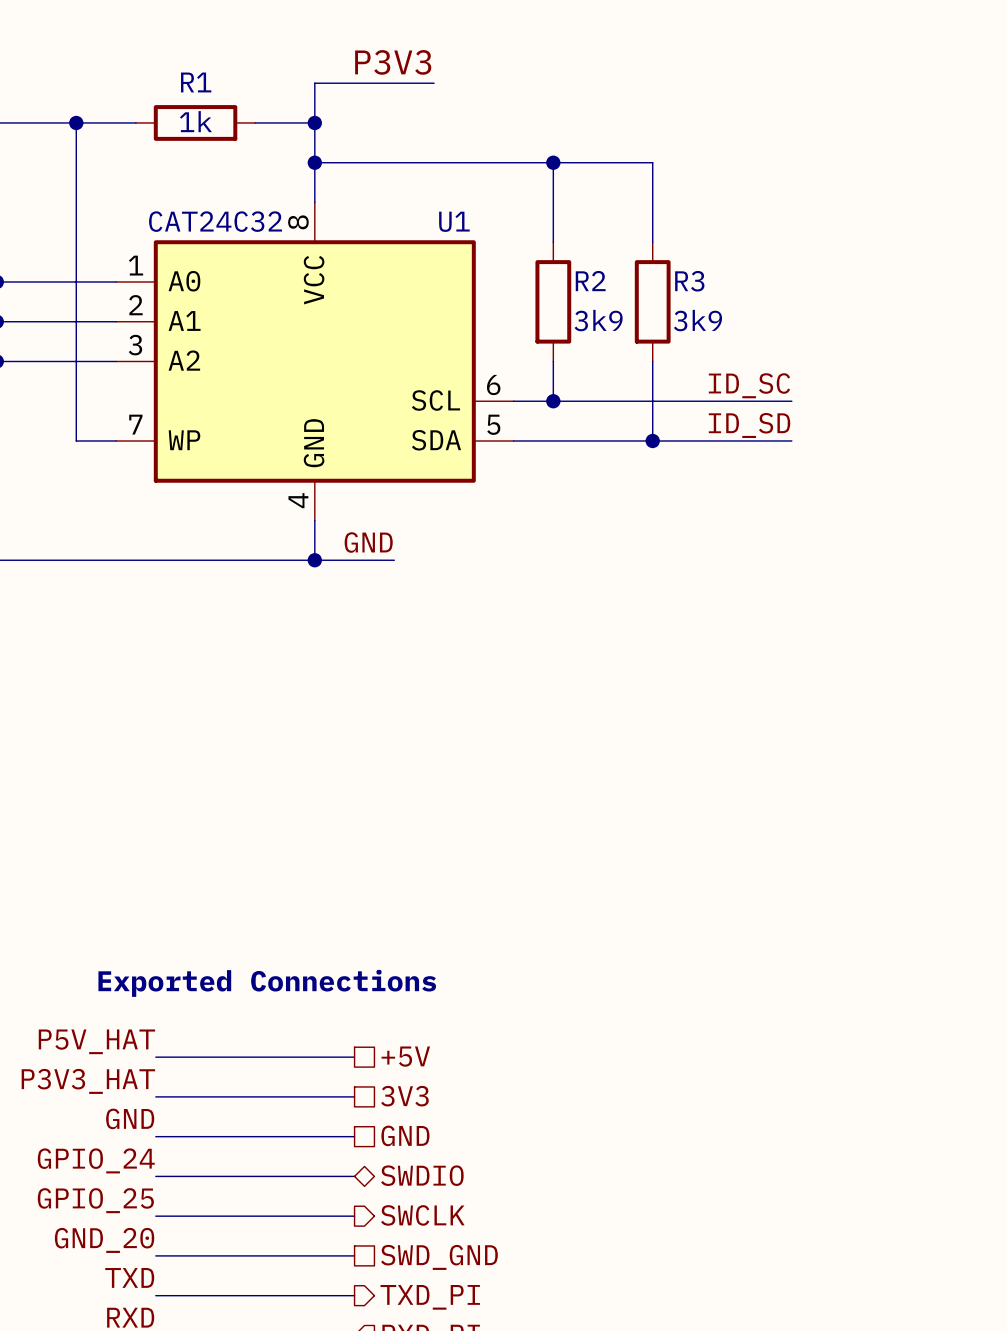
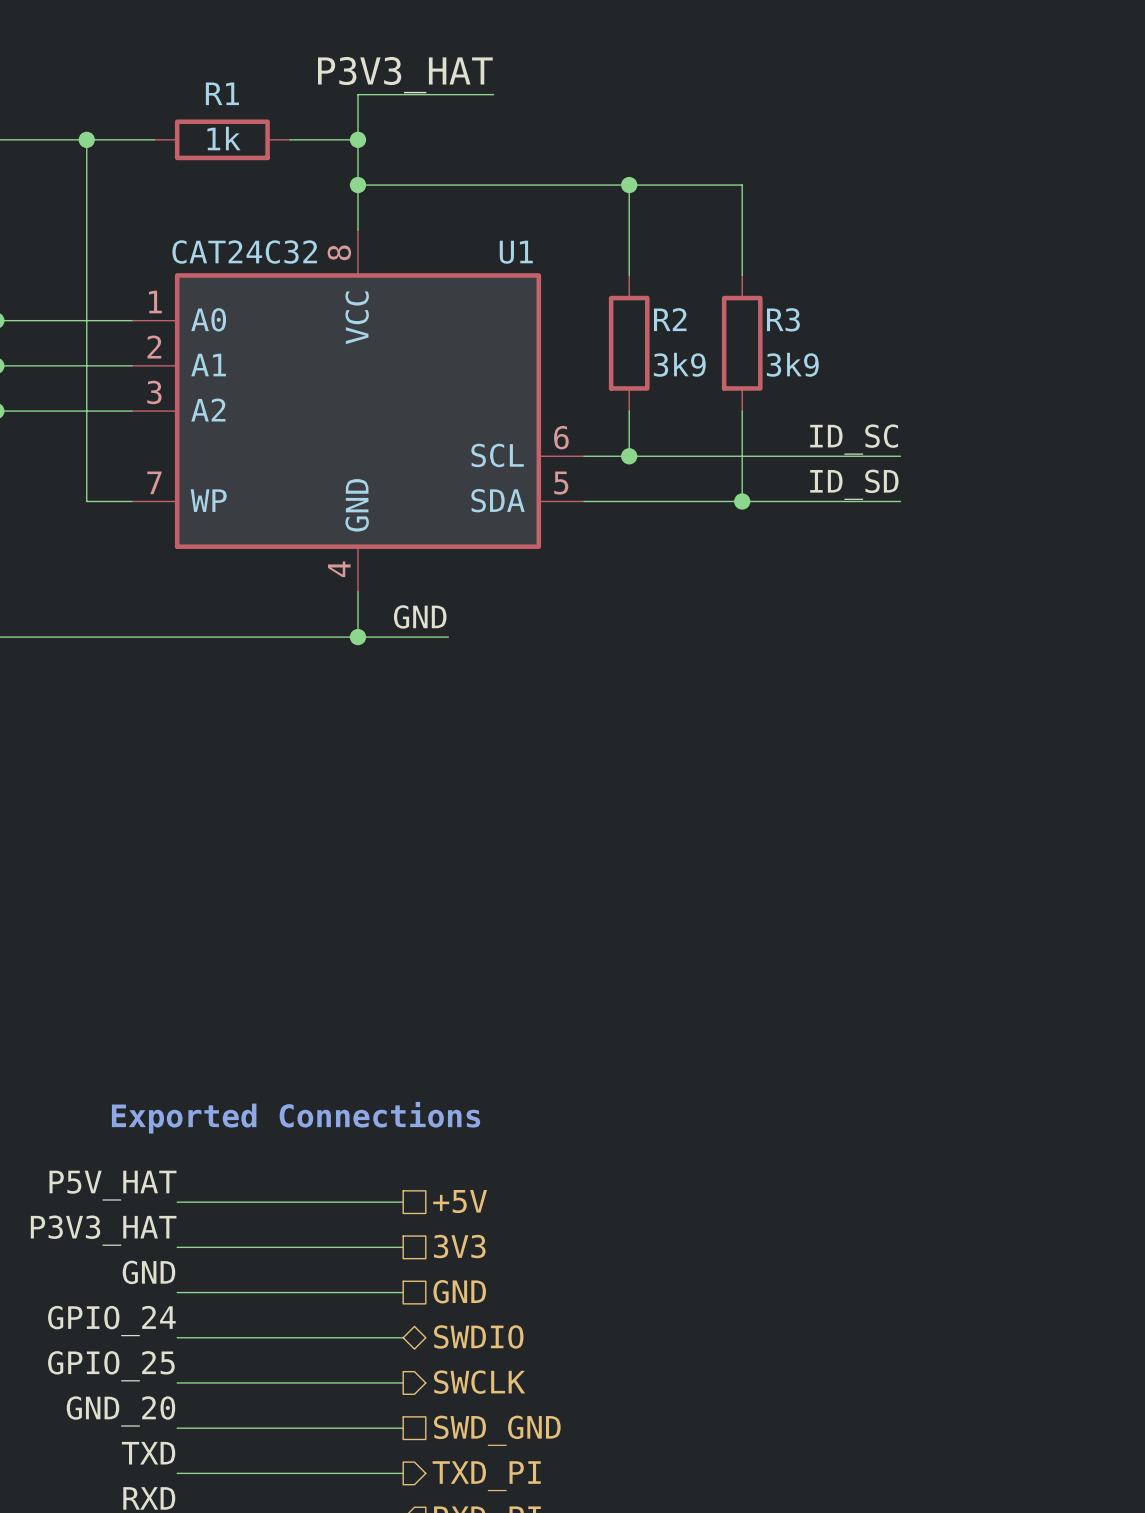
label: P3V3 (393, 62) -> P3V3_HAT (405, 75)

